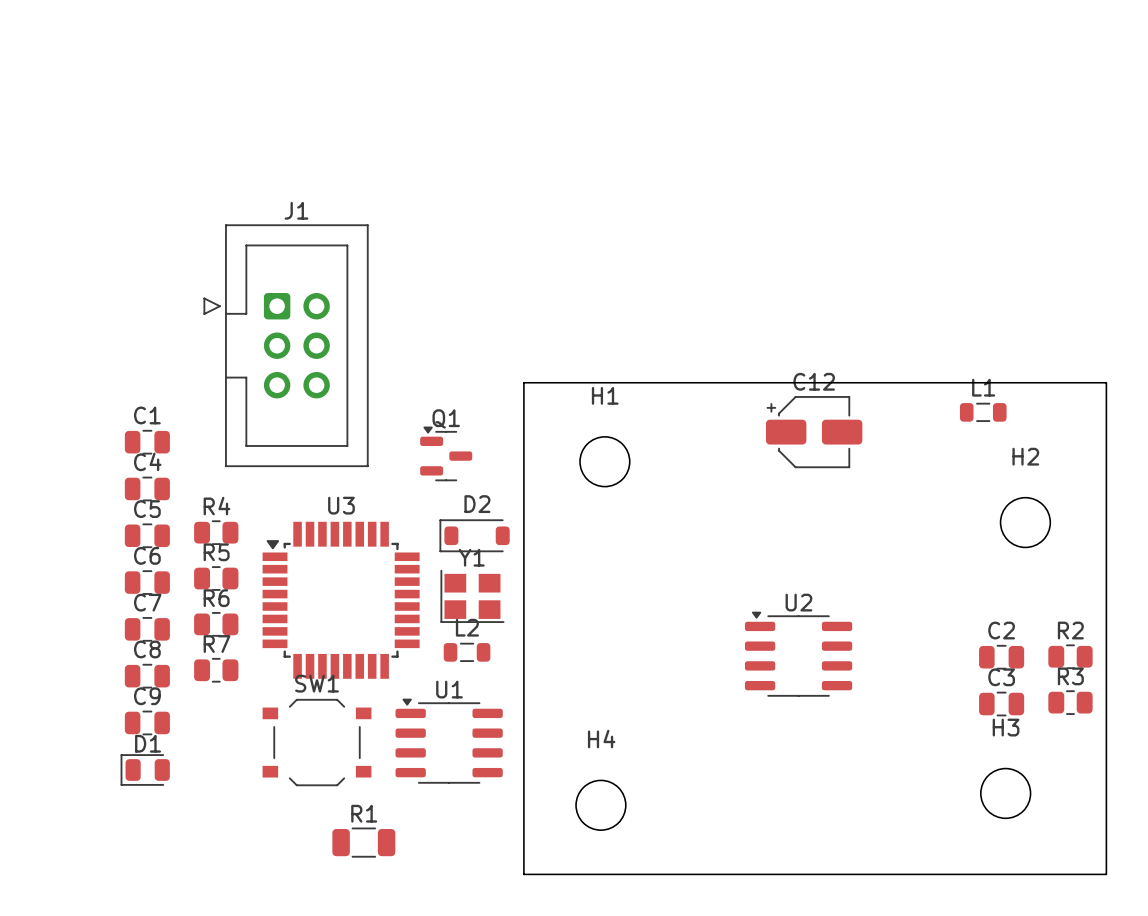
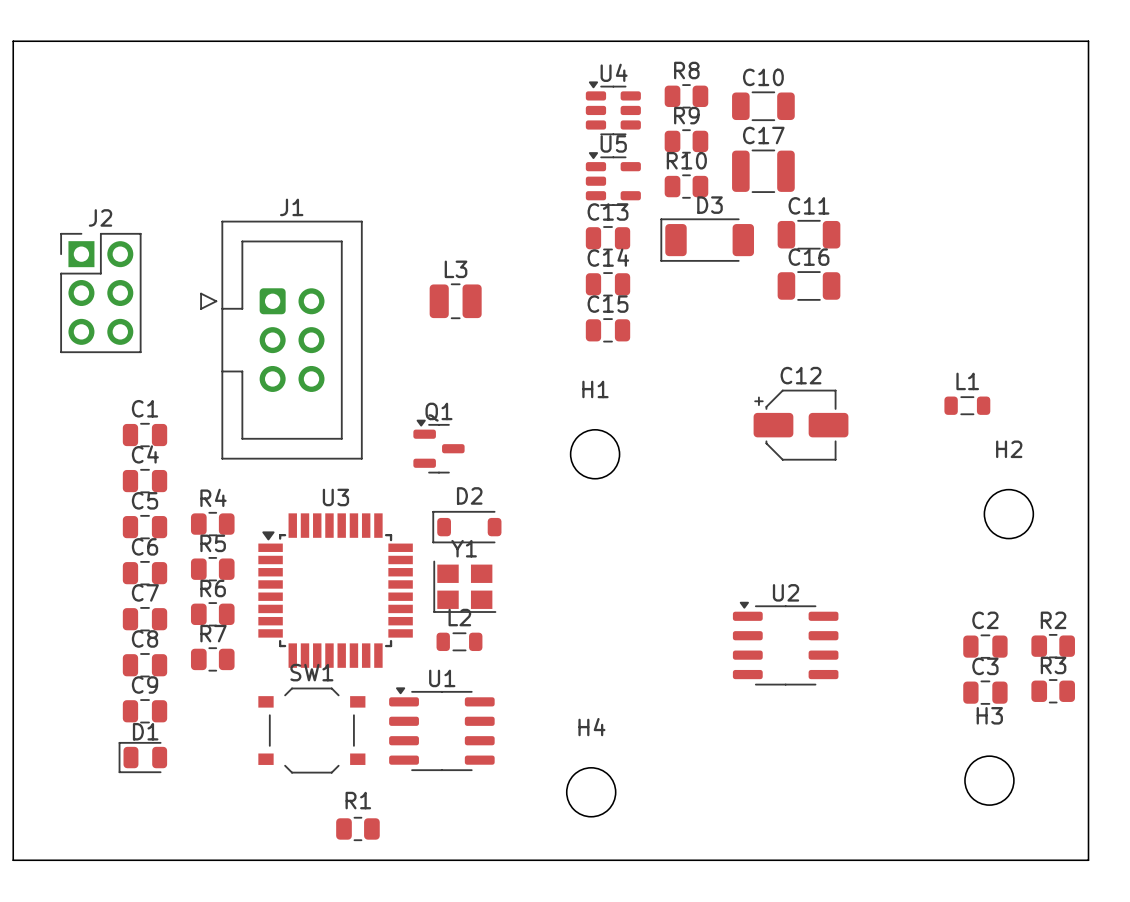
R8: none -> (686, 96)
C10: none -> (763, 106)
U4: none -> (613, 108)
R9: none -> (686, 141)
C17: none -> (763, 171)
U5: none -> (613, 179)
R10: none -> (686, 186)
C11: none -> (808, 234)
C13: none -> (608, 238)
D3: none -> (707, 240)
C14: none -> (608, 284)
C16: none -> (808, 285)
J2: none -> (100, 293)
L3: none -> (455, 301)
C15: none -> (608, 330)
board edge: (1106, 382) (523, 382) (523, 874) -> (1088, 376) (1088, 41) (13, 41) (13, 860) (515, 860)
R1 footprint: [332, 827, 396, 858] -> [336, 816, 380, 842]

